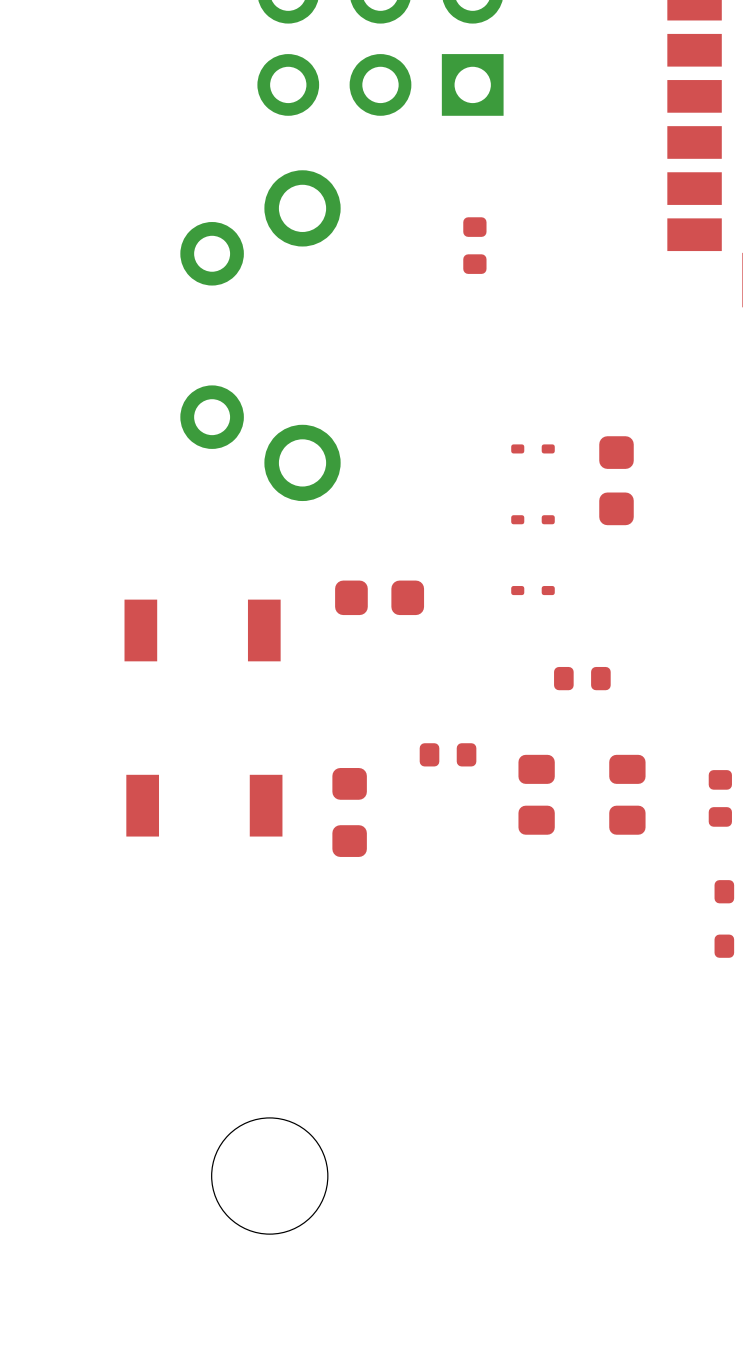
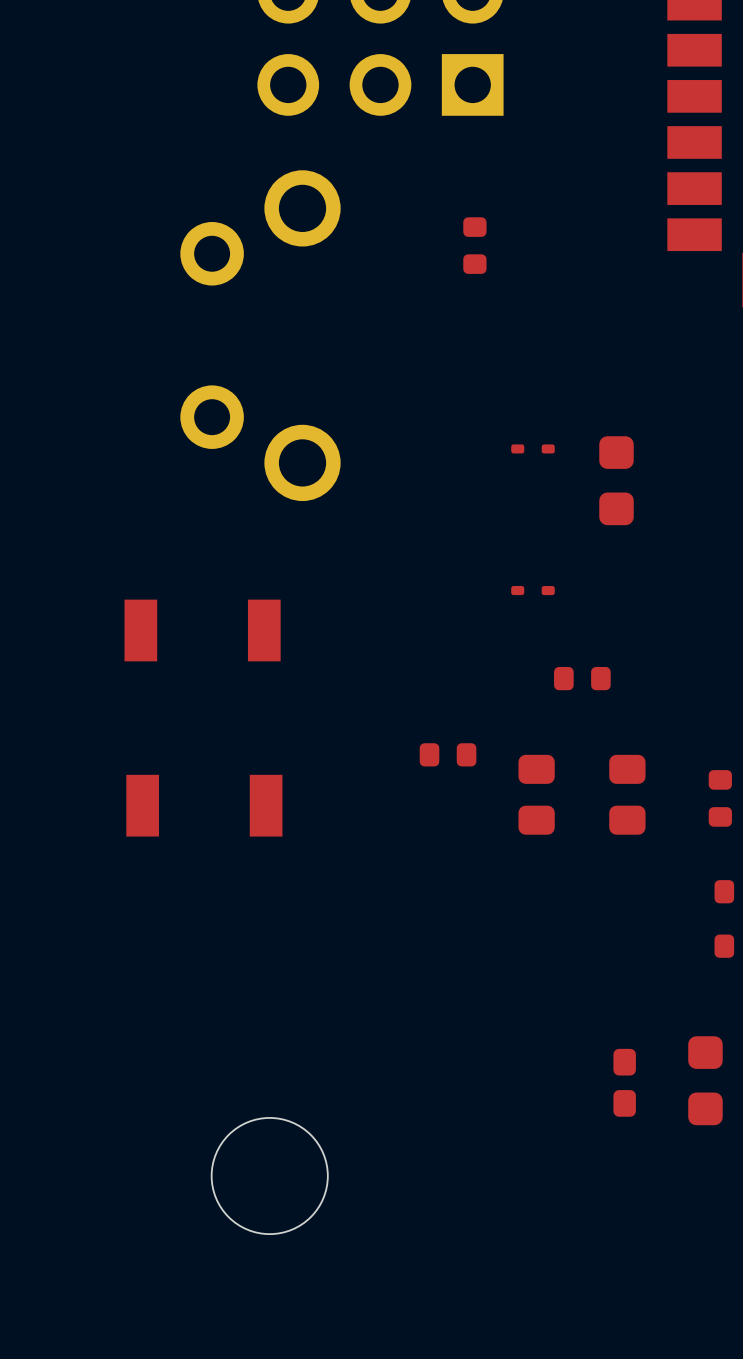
part: (532, 519) -> none
part rotation: 0° (379, 597) -> 90° clockwise (705, 1080)
part position: (379, 597) -> (705, 1080)
part: (349, 812) -> none
part: none -> (624, 1082)

